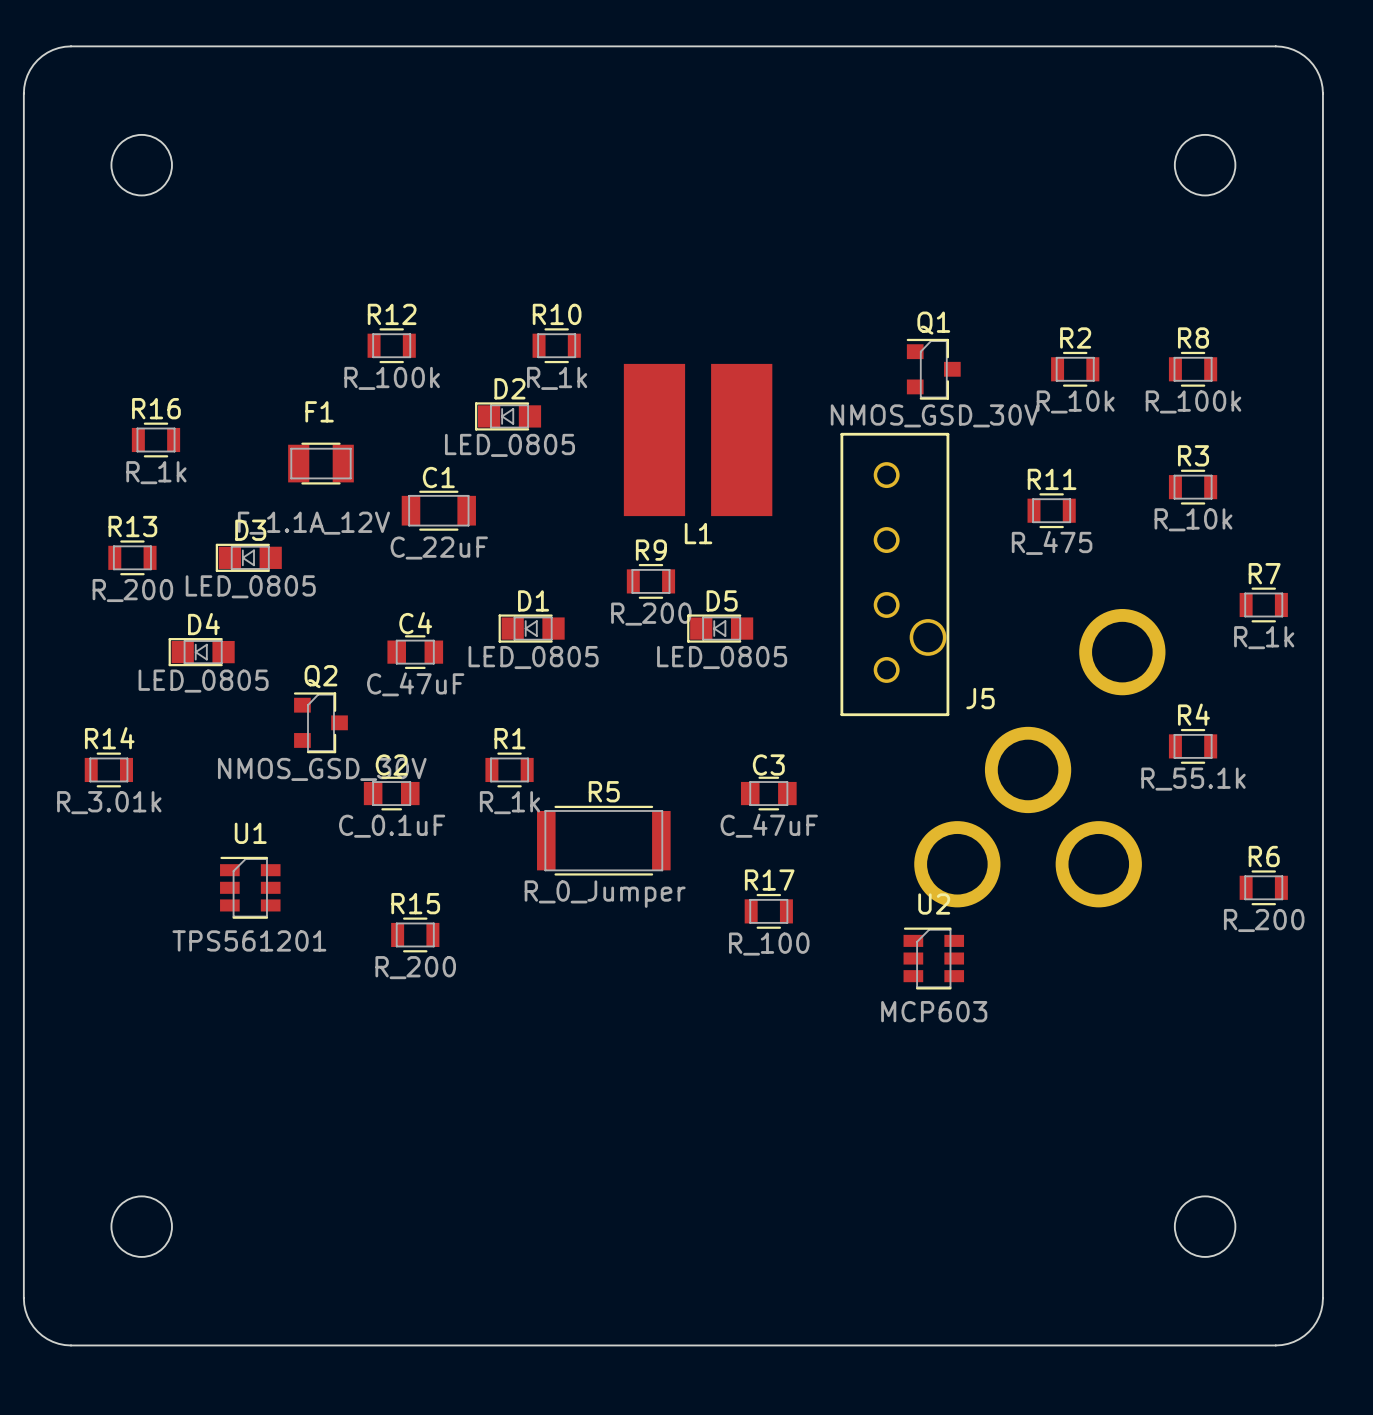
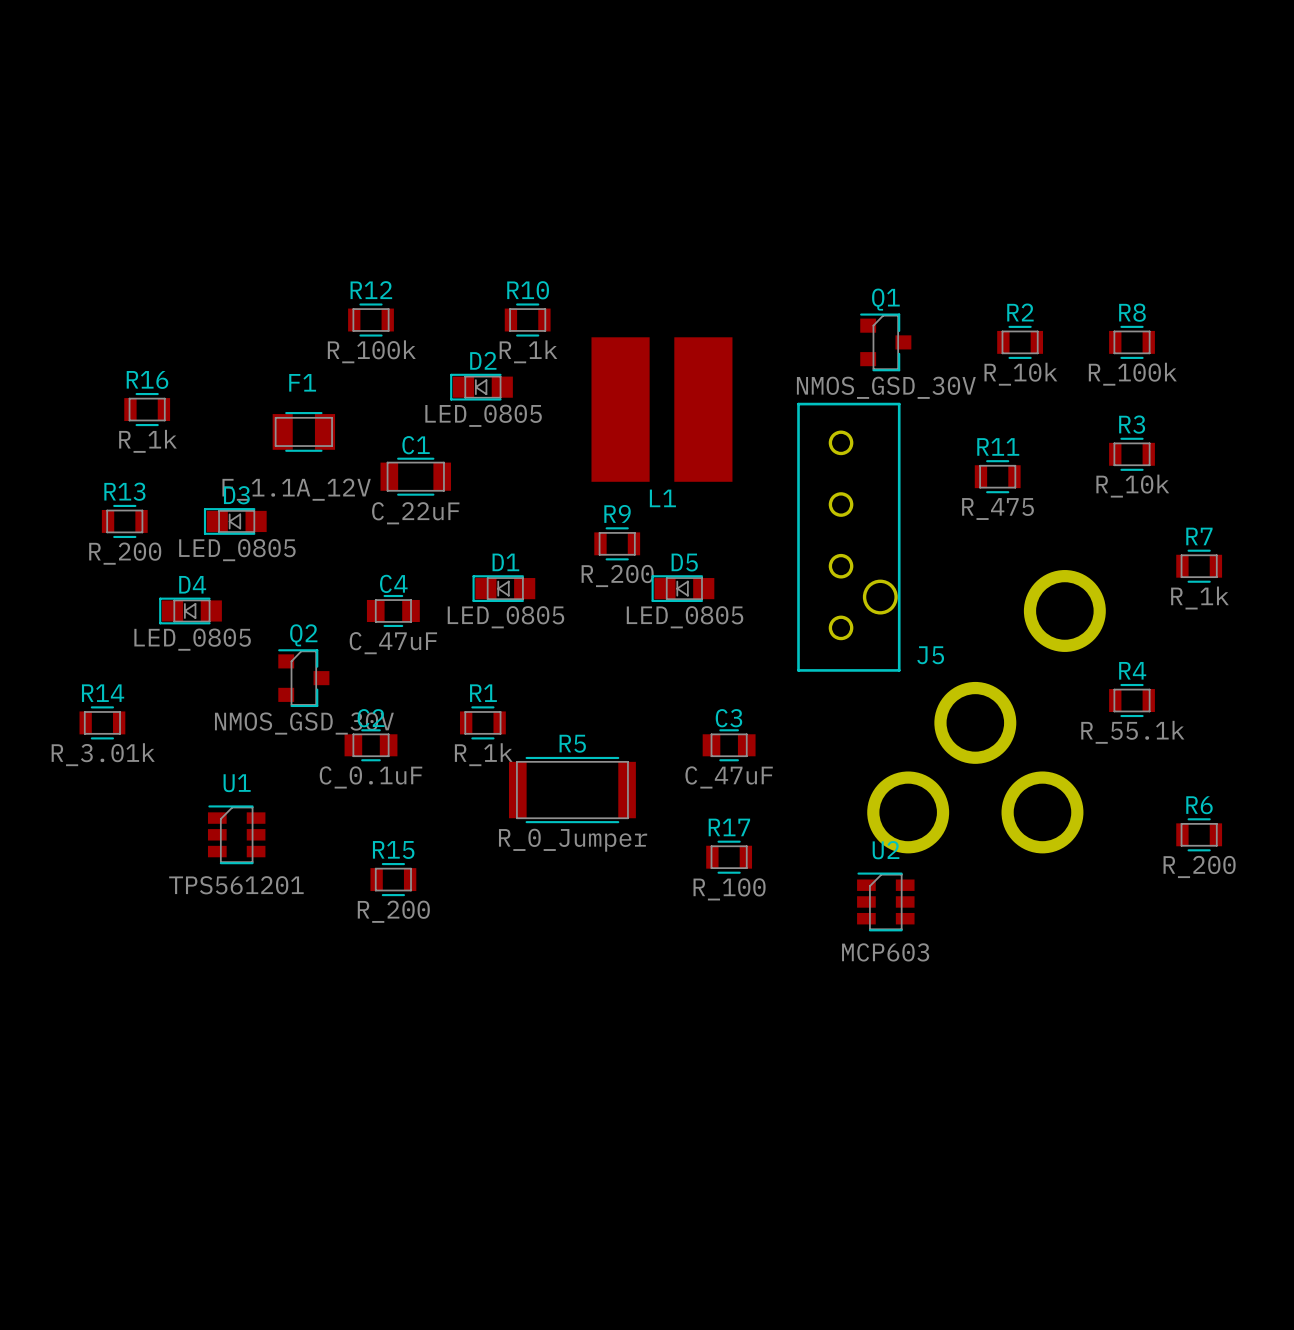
board edge: (71, 46) (1275, 46) (1293, 49) (1309, 60) (1319, 75) (1322, 93) (1322, 1298) (1319, 1316) (1309, 1331) (1293, 1341) (1275, 1345) (71, 1345) (52, 1341) (37, 1331) (27, 1316) (23, 1298) (23, 93) (27, 75) (37, 60) (52, 49) (71, 46) -> none
round board edge: [110, 133, 173, 197] -> none
round board edge: [1173, 133, 1237, 197] -> none
round board edge: [110, 1195, 173, 1258] -> none
round board edge: [1173, 1195, 1237, 1258] -> none

